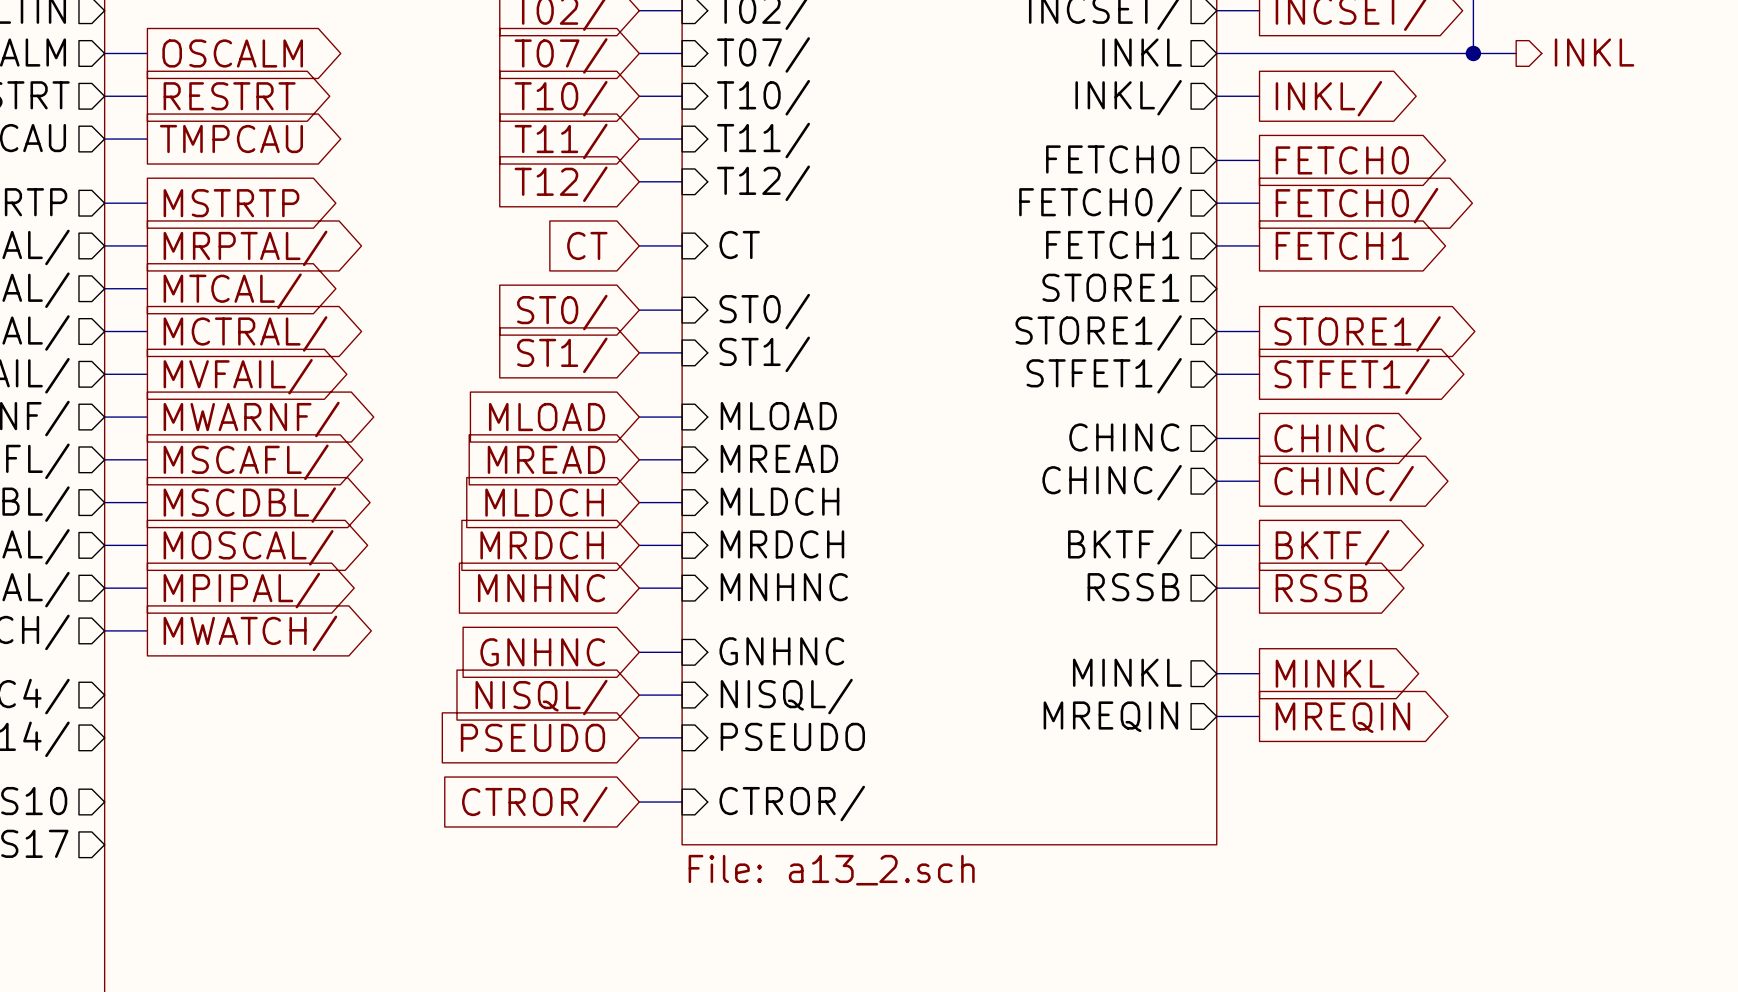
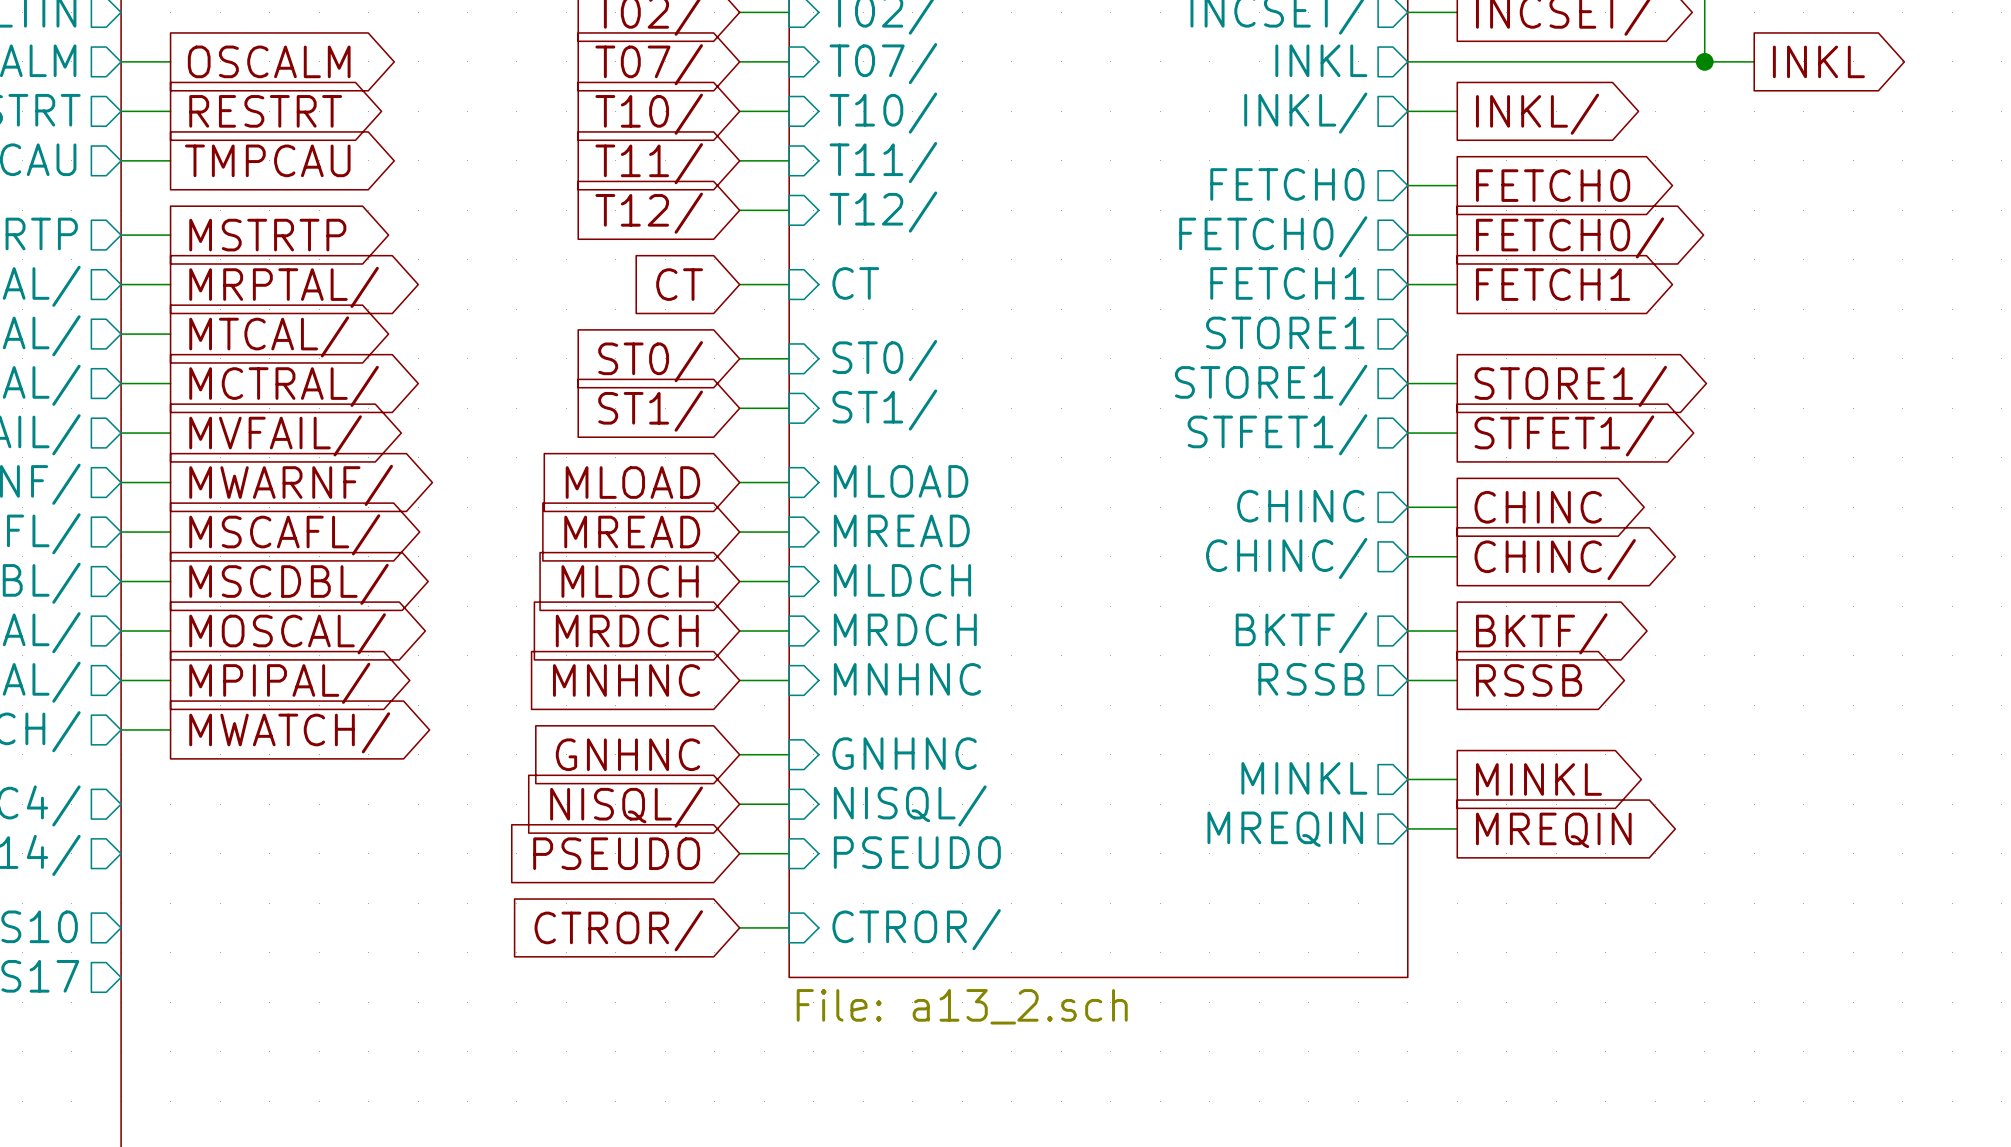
hierarchical label: INKL (1594, 52) -> none
global label: none -> INKL (1818, 61)

